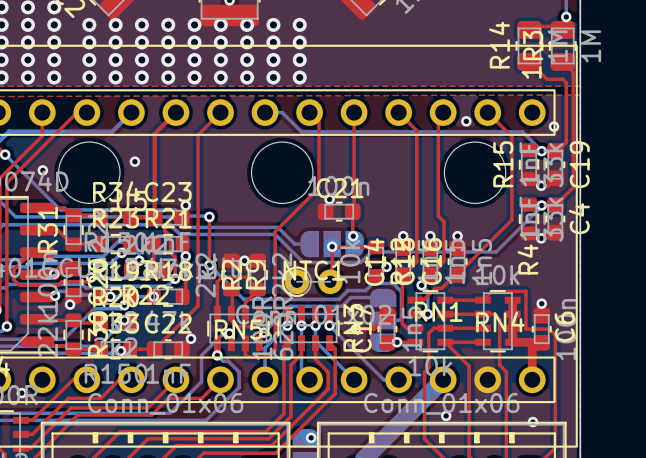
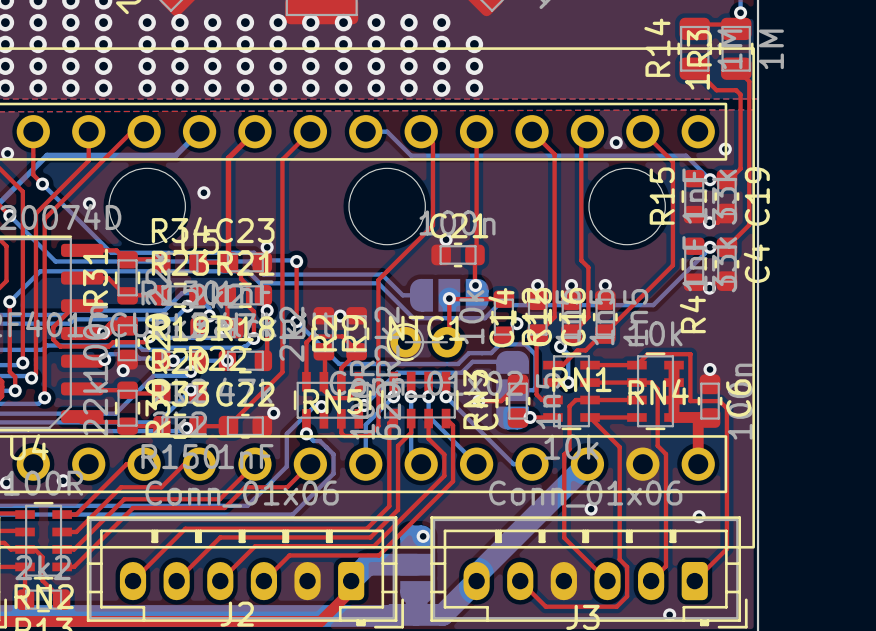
via: none -> (441, 22)
via: none -> (441, 44)
via: none -> (474, 44)
via: none -> (441, 66)
via: none -> (474, 66)
via: none -> (441, 88)
via: none -> (474, 88)

